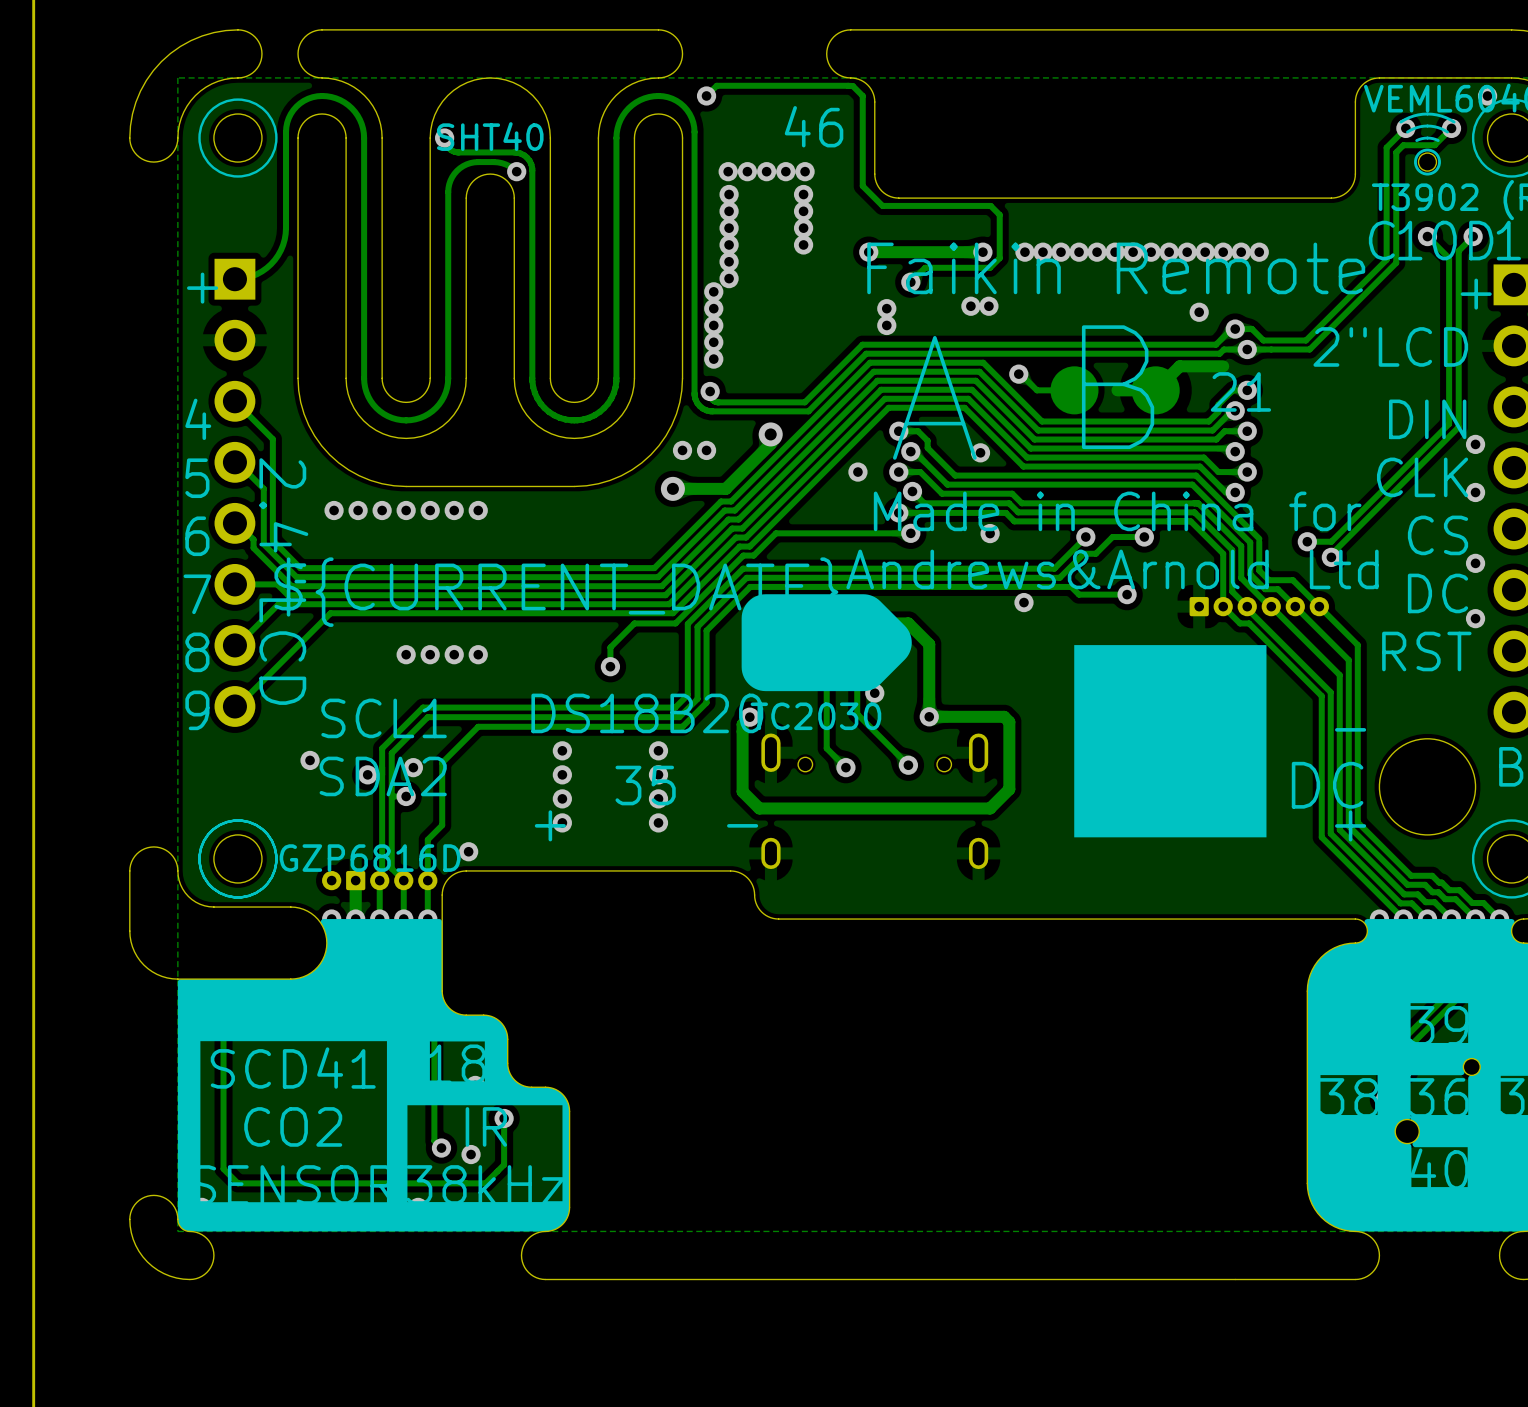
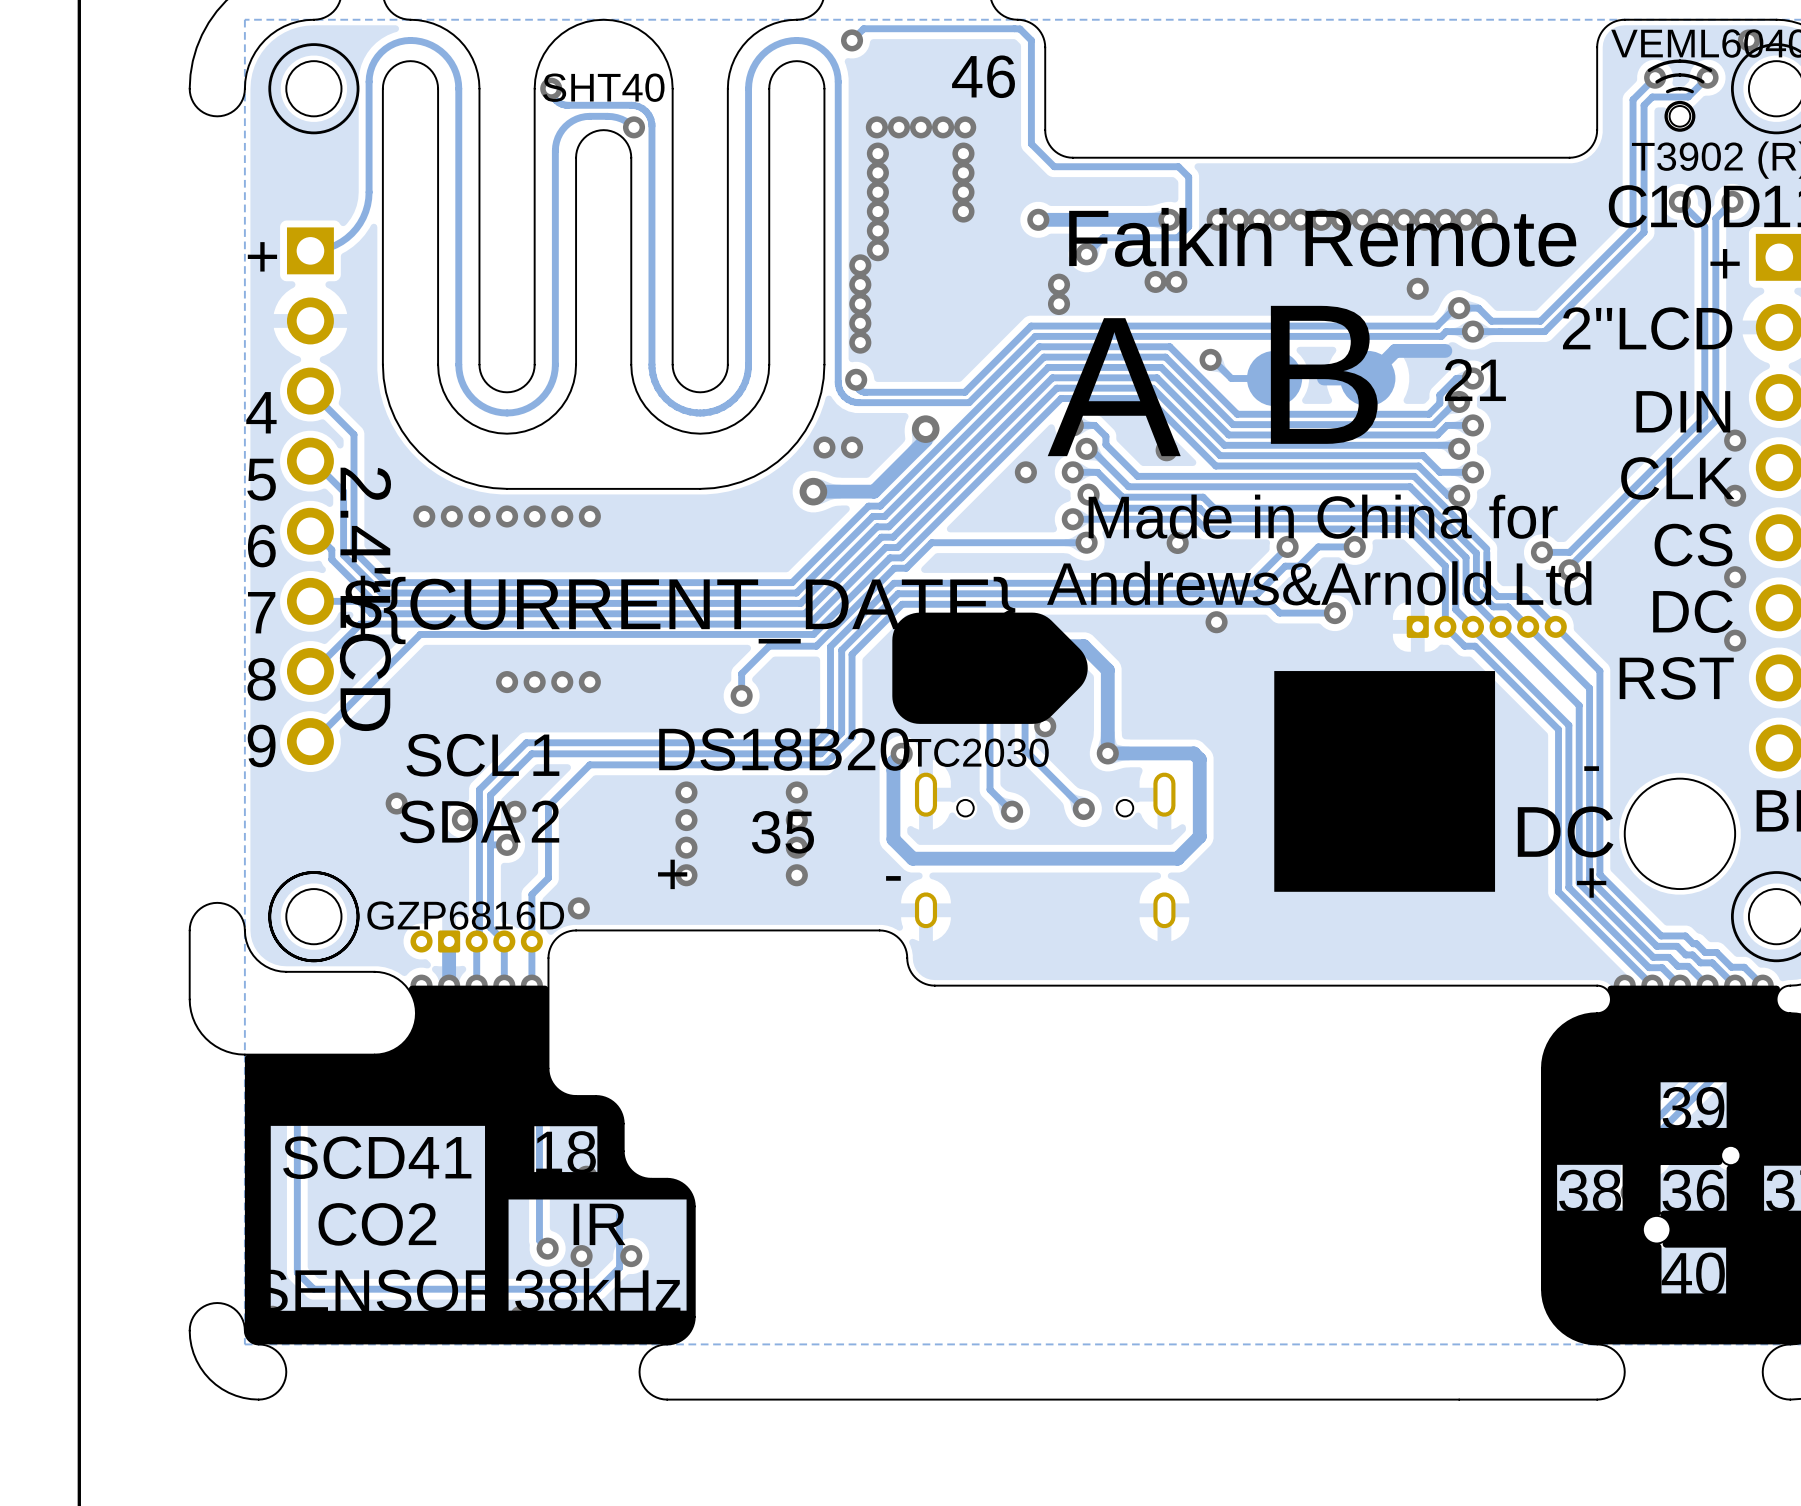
via position: (504, 1118) -> (631, 1256)

